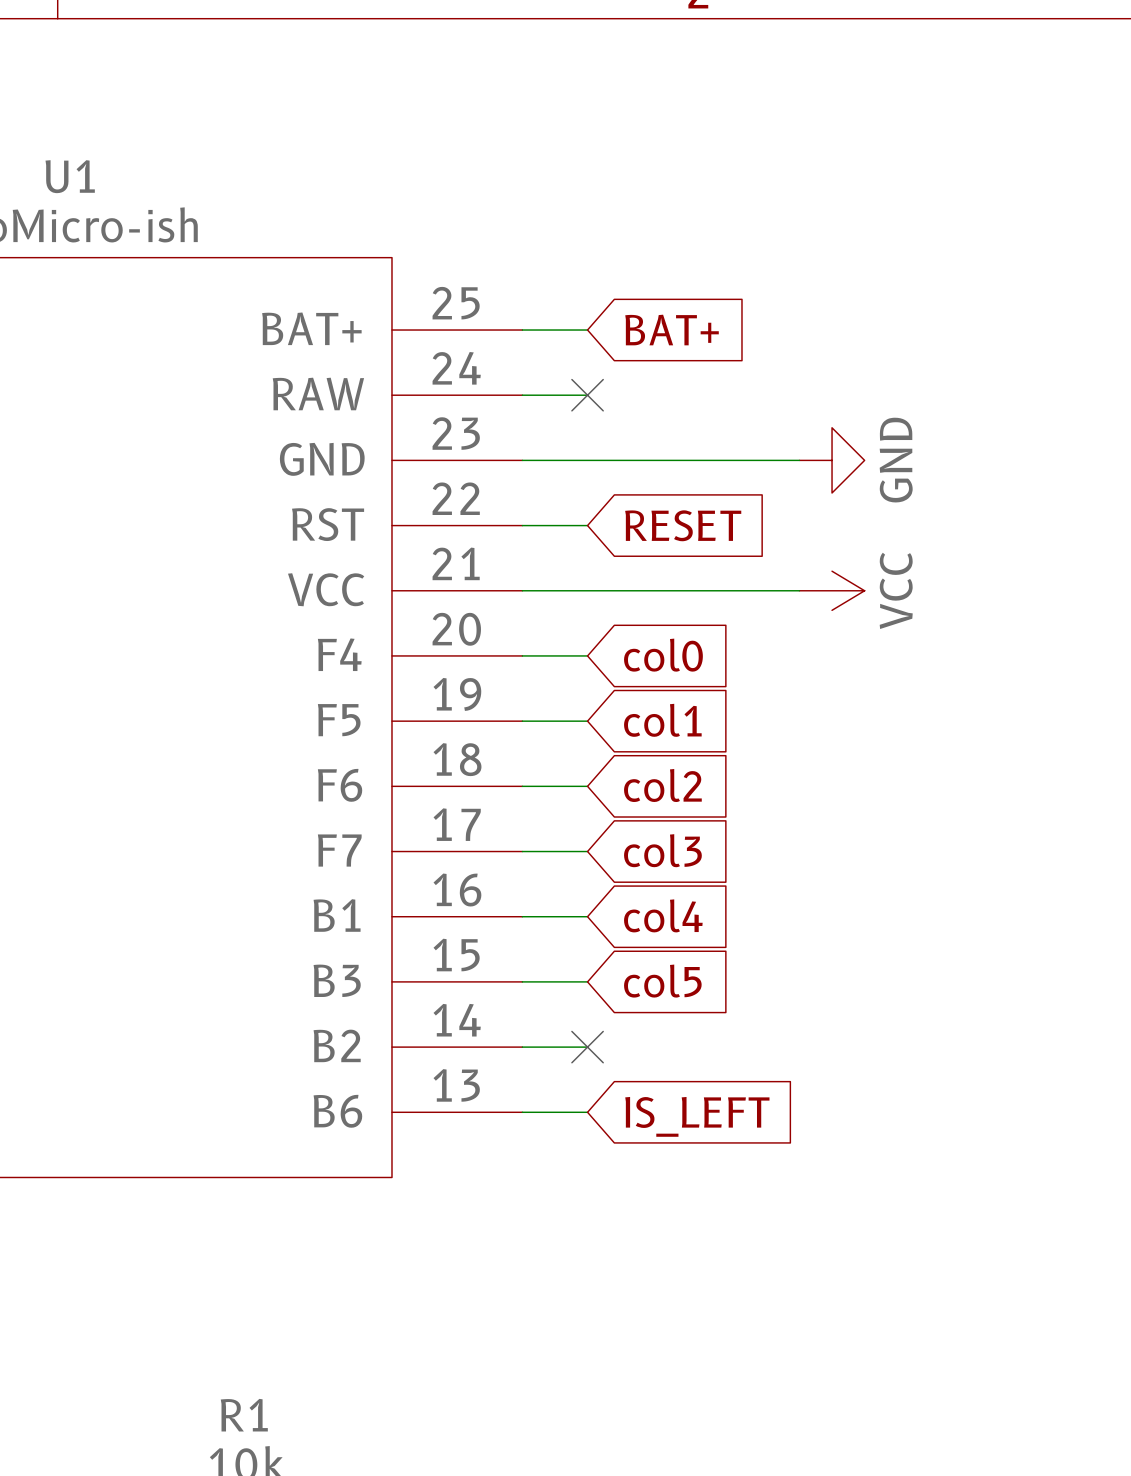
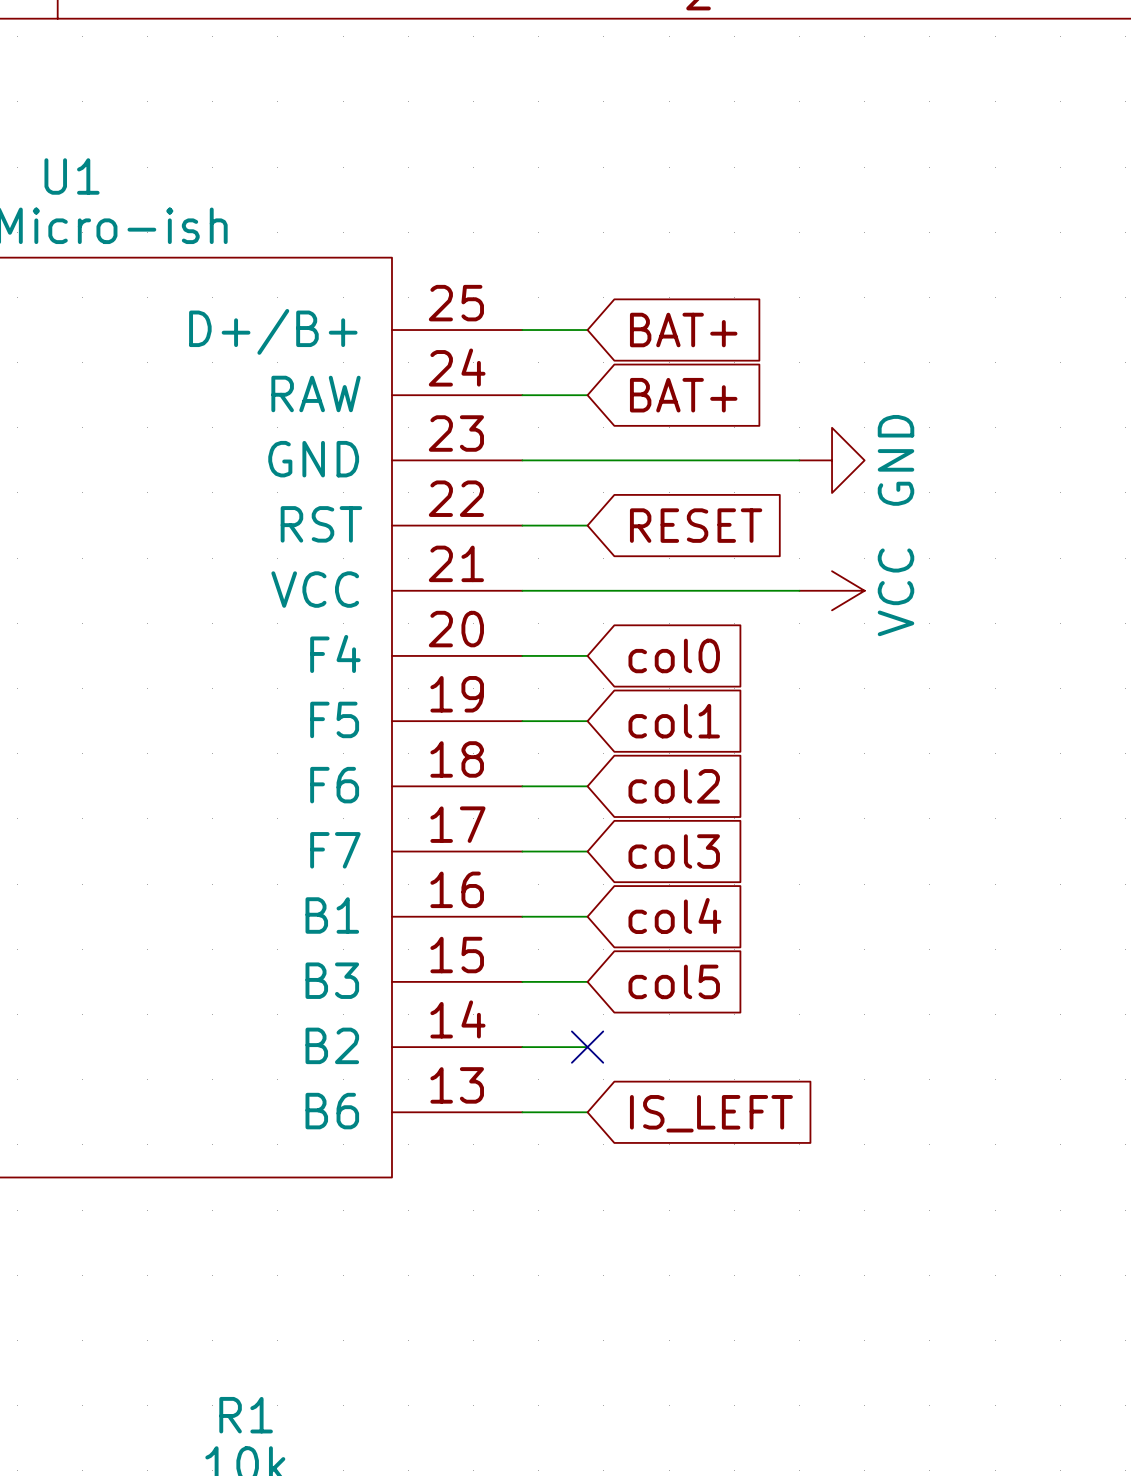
U1 pin name: BAT+ (311, 328) -> D+/B+ (273, 331)
no-connect mark: (587, 395) -> none
global label: none -> BAT+ (683, 395)

